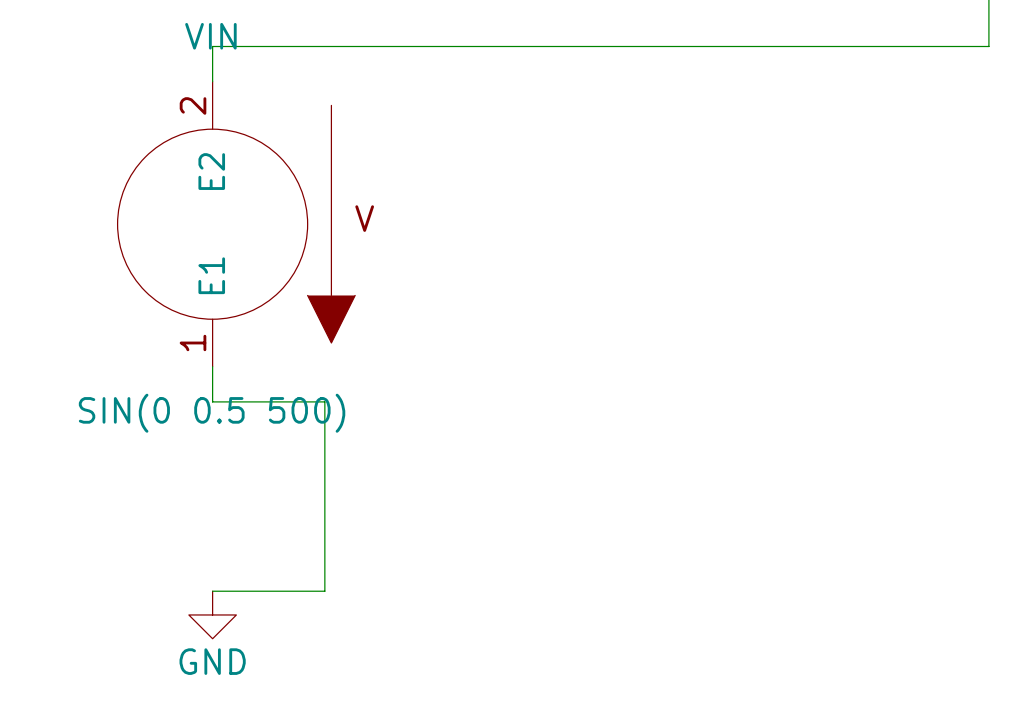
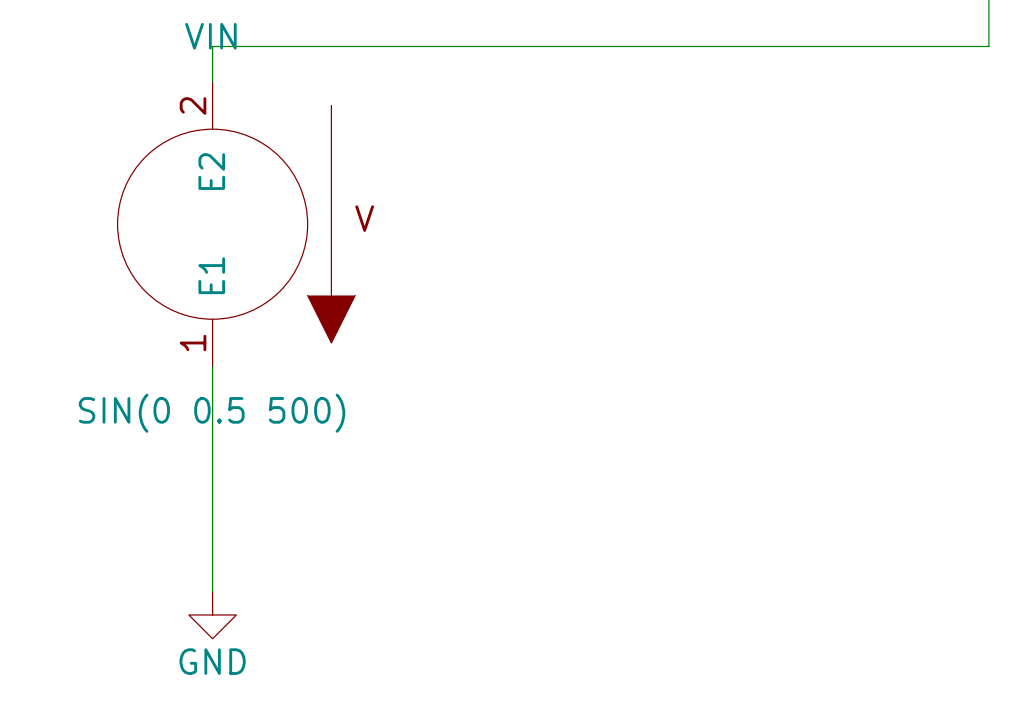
wire: (212, 401) (324, 401) (324, 591) (212, 591) -> (212, 401) (212, 591)

